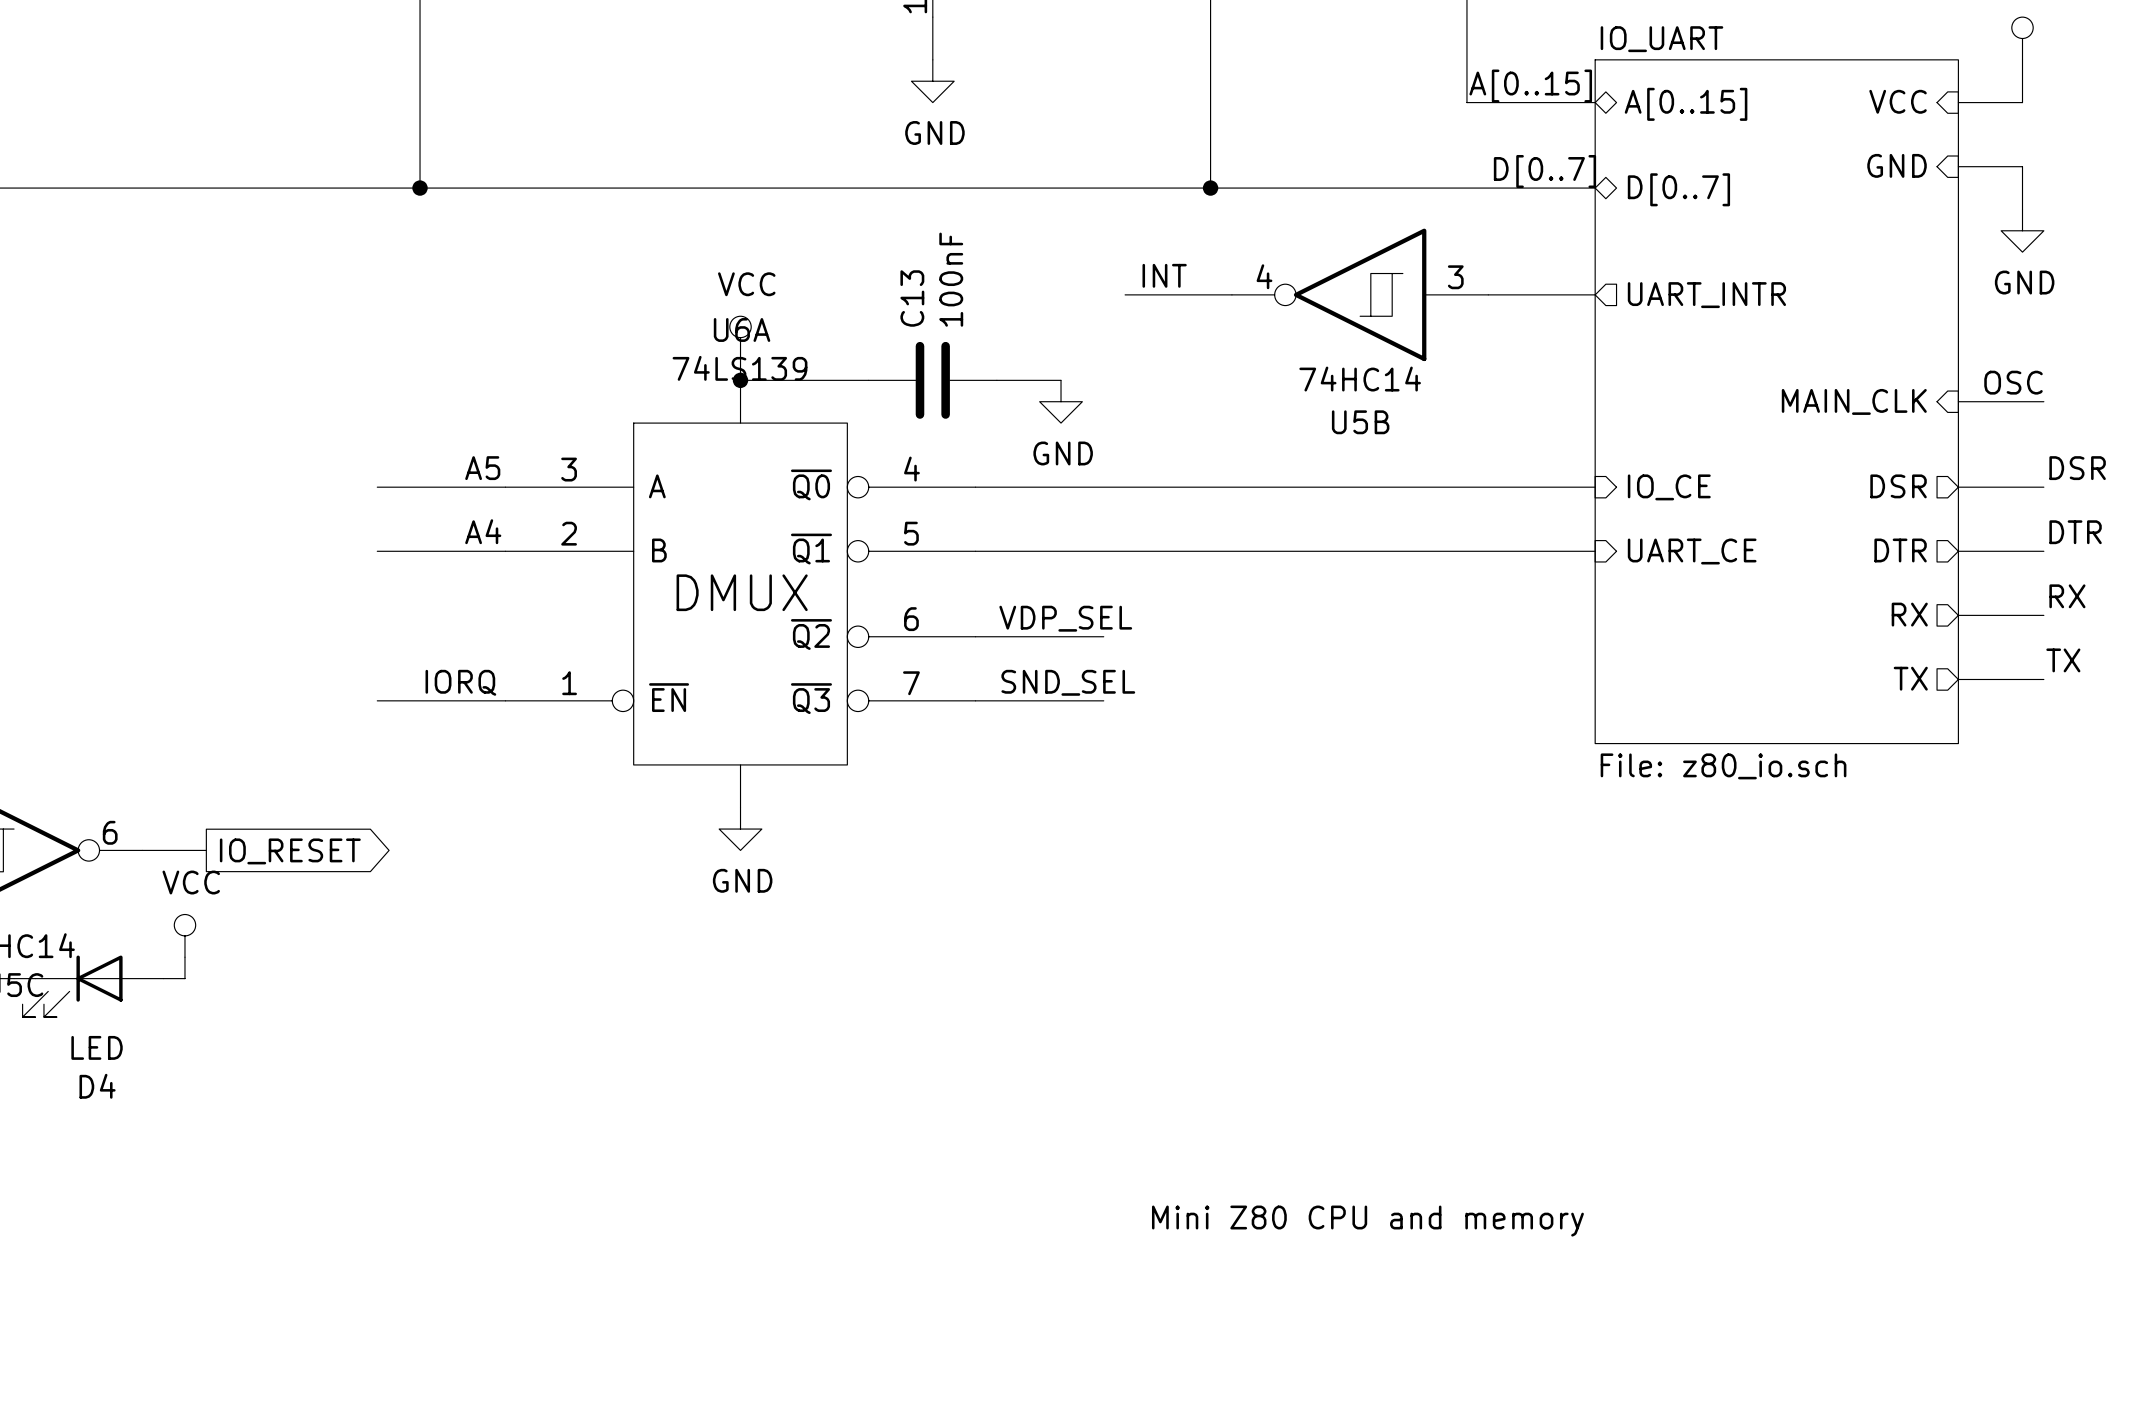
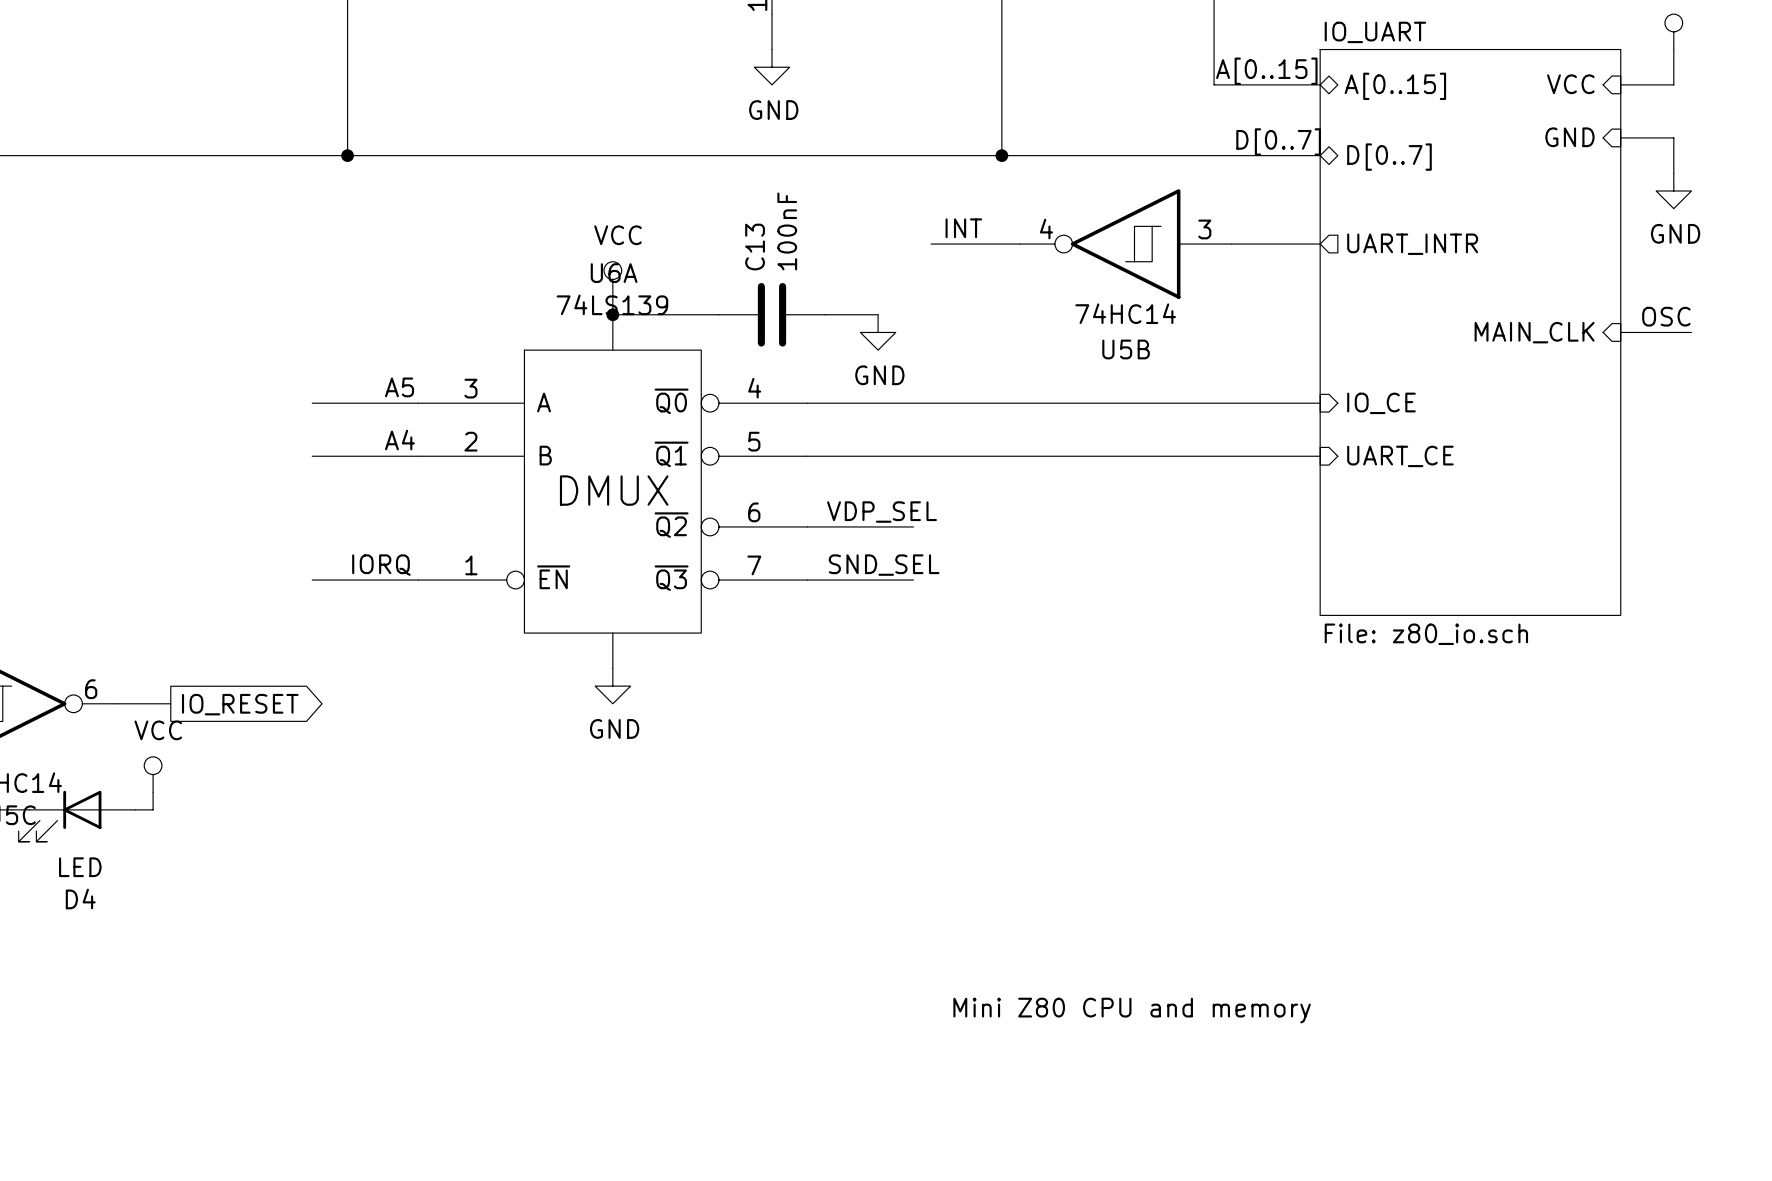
label: DSR (2077, 468) -> none
sheet pin: DSR (1898, 486) -> none
wire: (1958, 487) (2043, 487) -> none
label: DTR (2075, 532) -> none
sheet pin: DTR (1900, 550) -> none
wire: (1958, 551) (2043, 551) -> none
label: RX (2067, 596) -> none
sheet pin: RX (1909, 614) -> none
wire: (1958, 615) (2043, 615) -> none
label: TX (2063, 660) -> none
sheet pin: TX (1910, 678) -> none
wire: (1958, 679) (2043, 679) -> none

